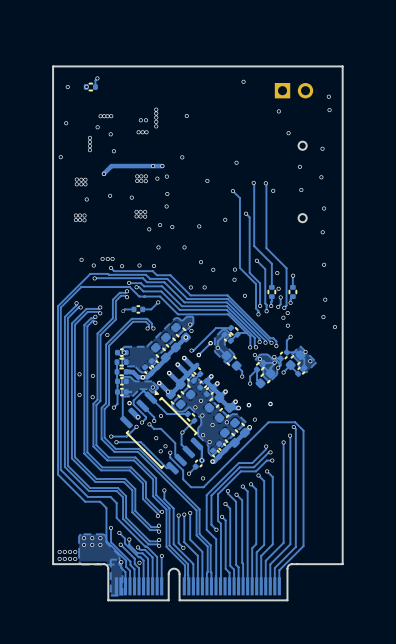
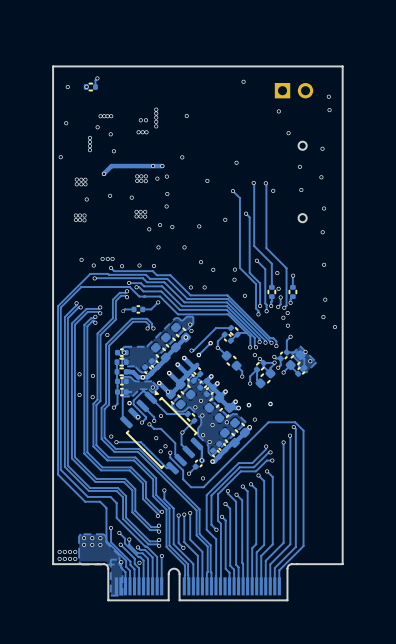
zone outline: (225, 329) (230, 335) (224, 340) (224, 344) (234, 354) (227, 363) (214, 351) (214, 337) (222, 329) (225, 329) -> none
zone outline: (267, 354) (260, 354) (255, 360) (263, 368) (263, 376) (269, 381) (277, 374) (279, 363) (267, 354) -> none
track: (136, 426) (126, 436) (111, 436) -> none
via: (136, 426) -> none

